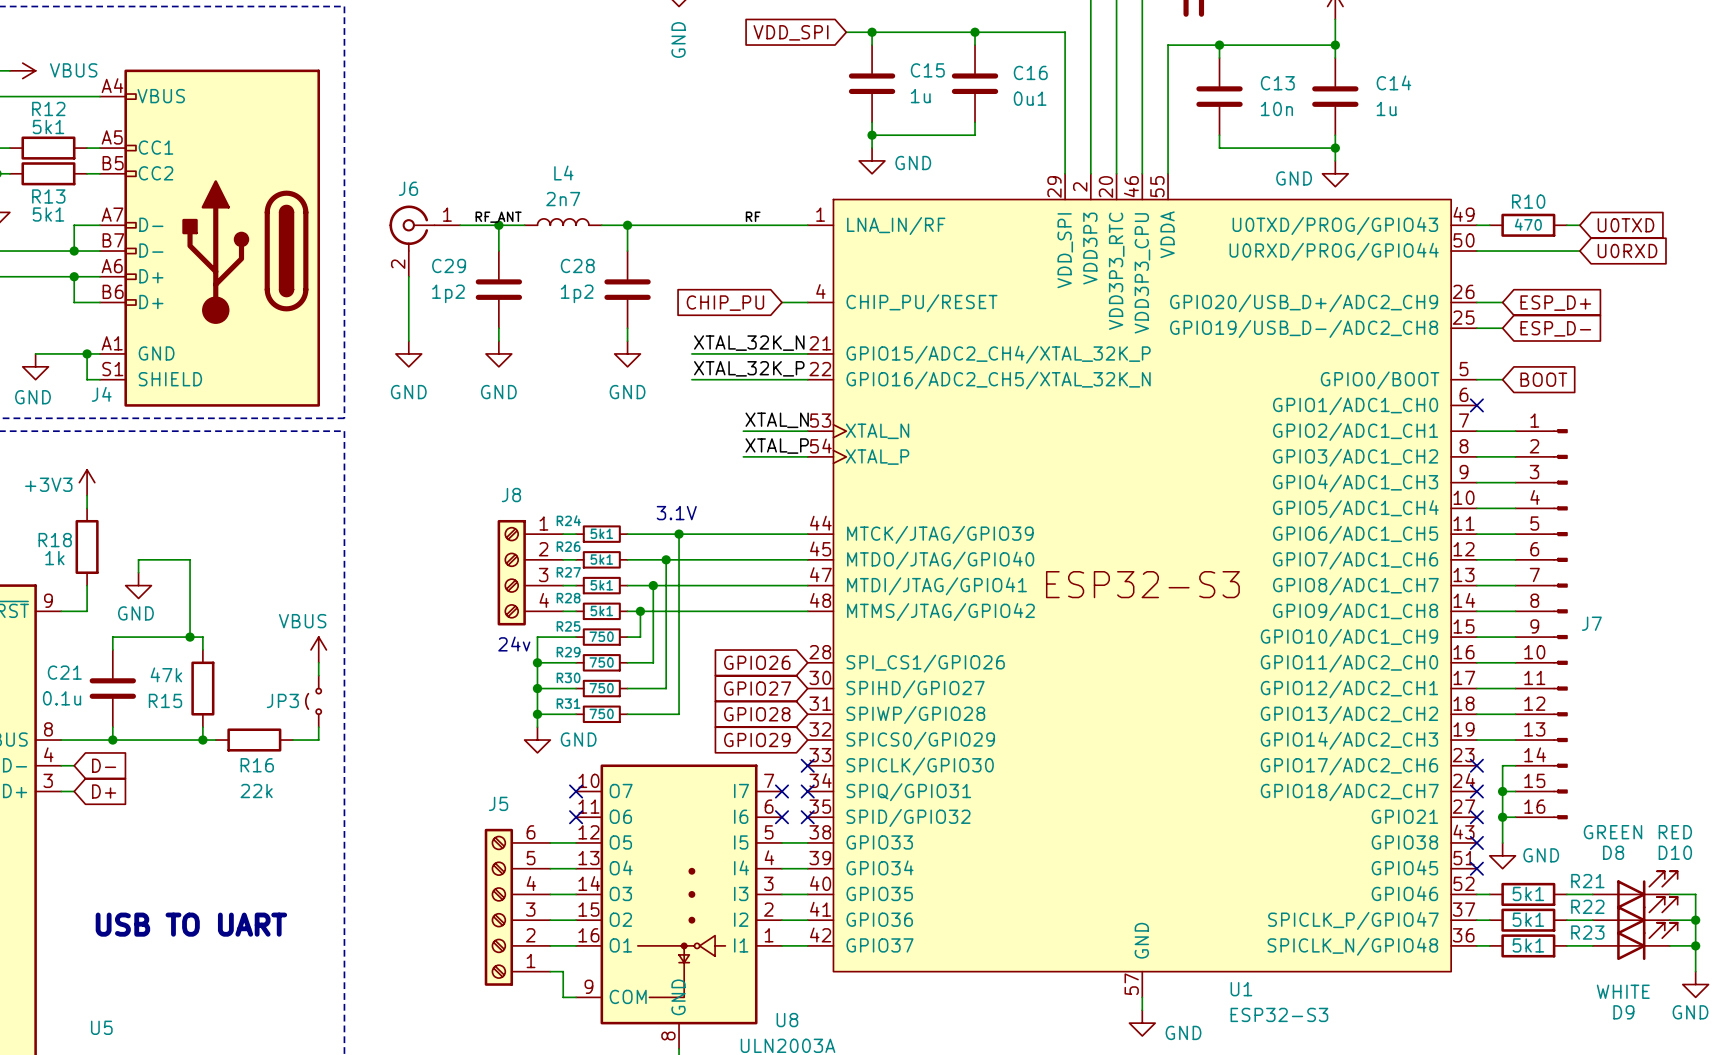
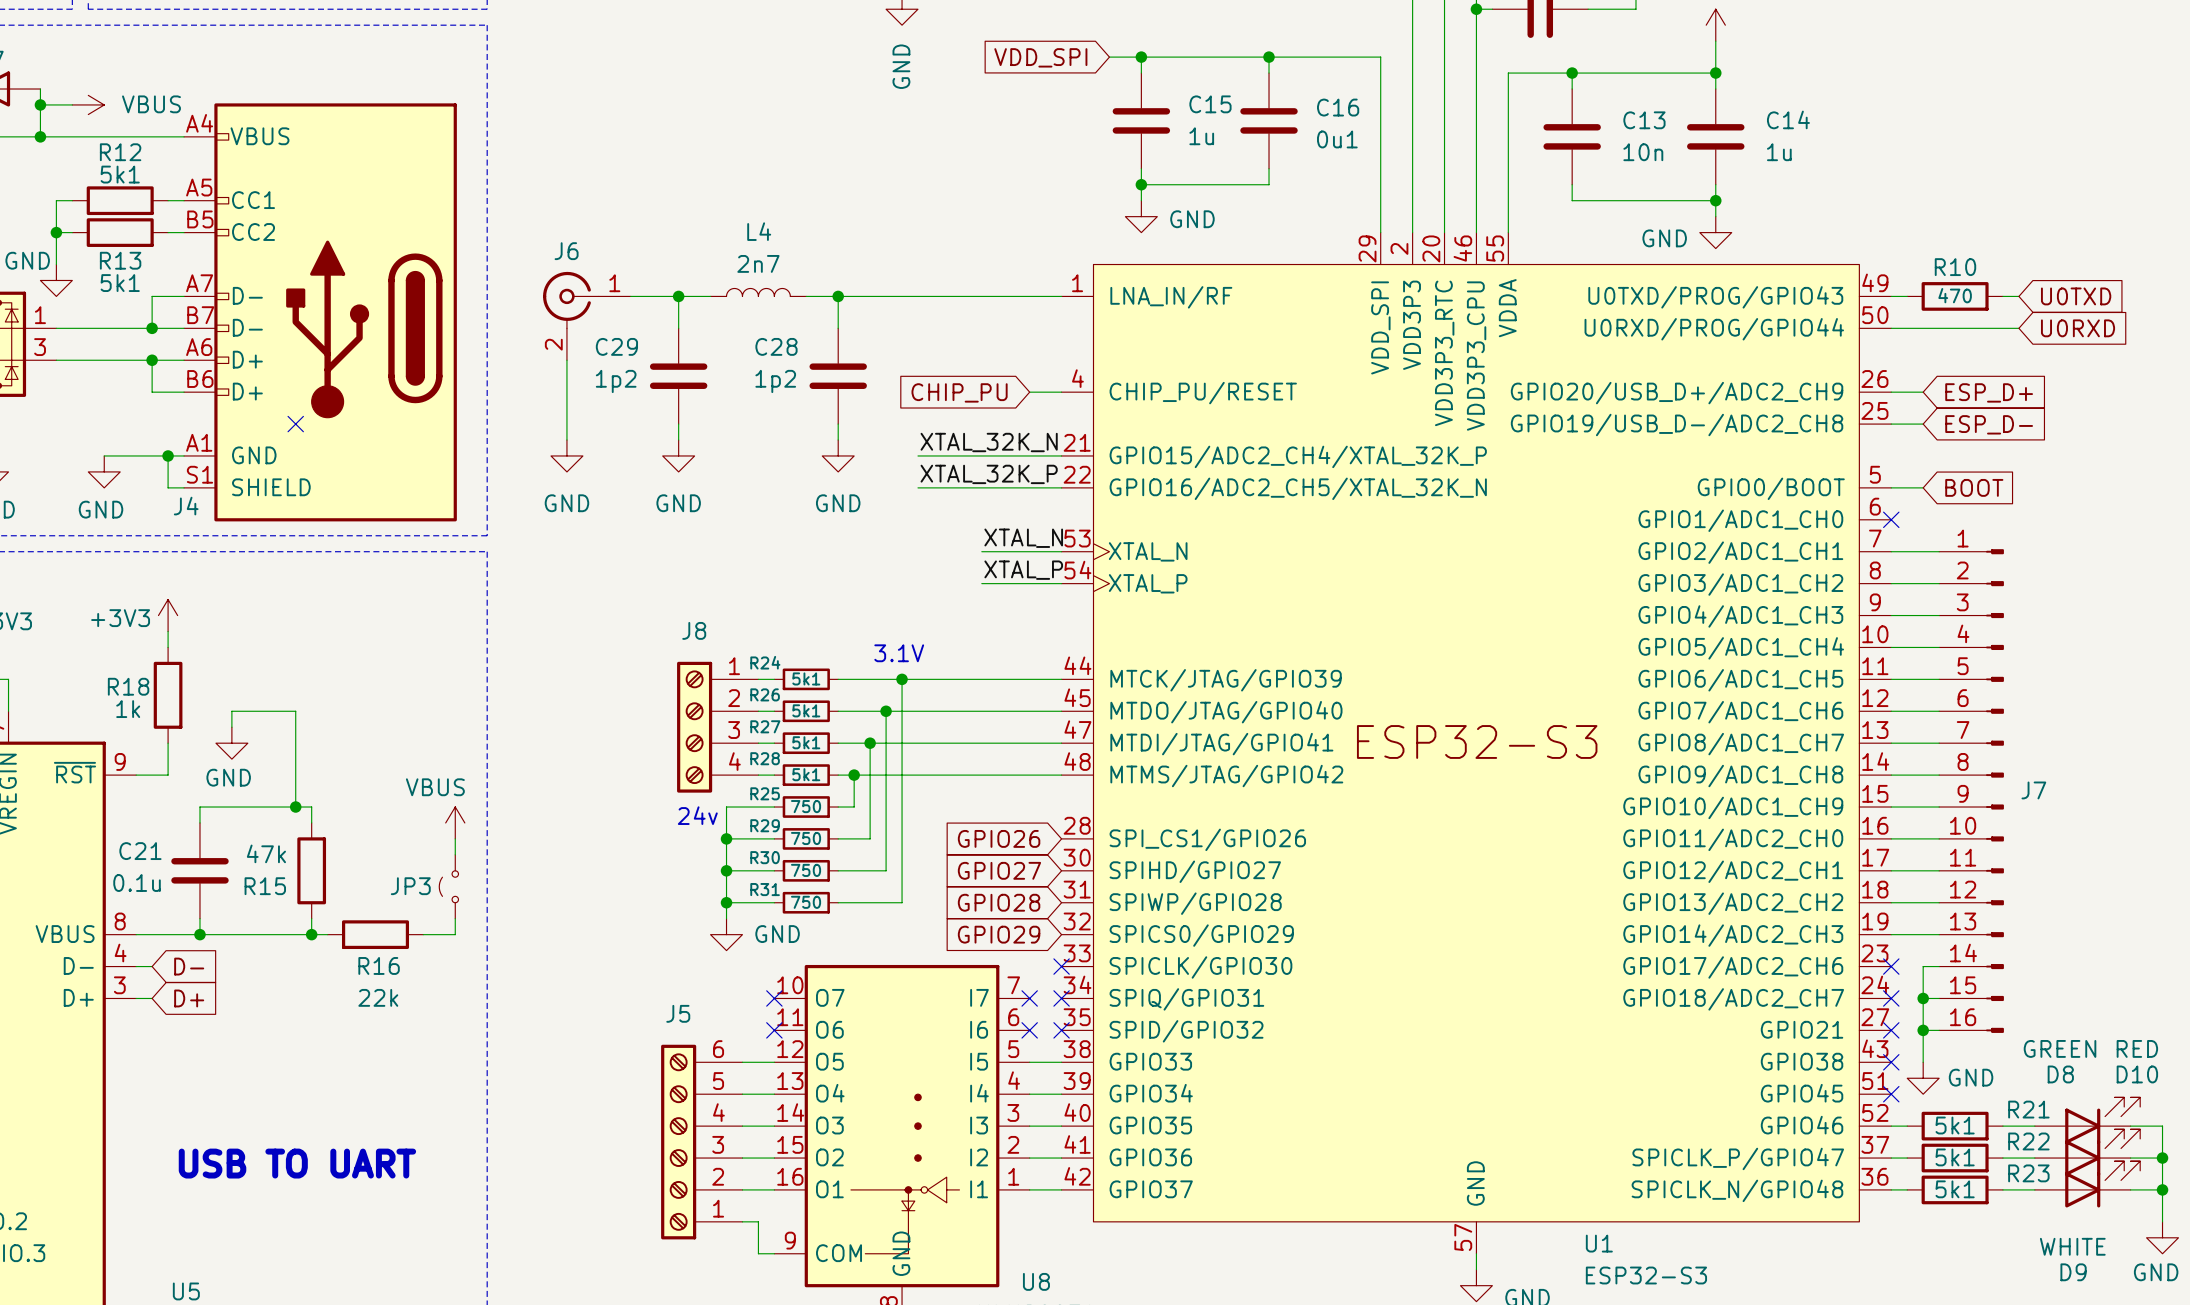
label: RF (753, 216) -> none
label: RF_ANT (498, 217) -> none
no-connect mark: none -> (295, 424)

